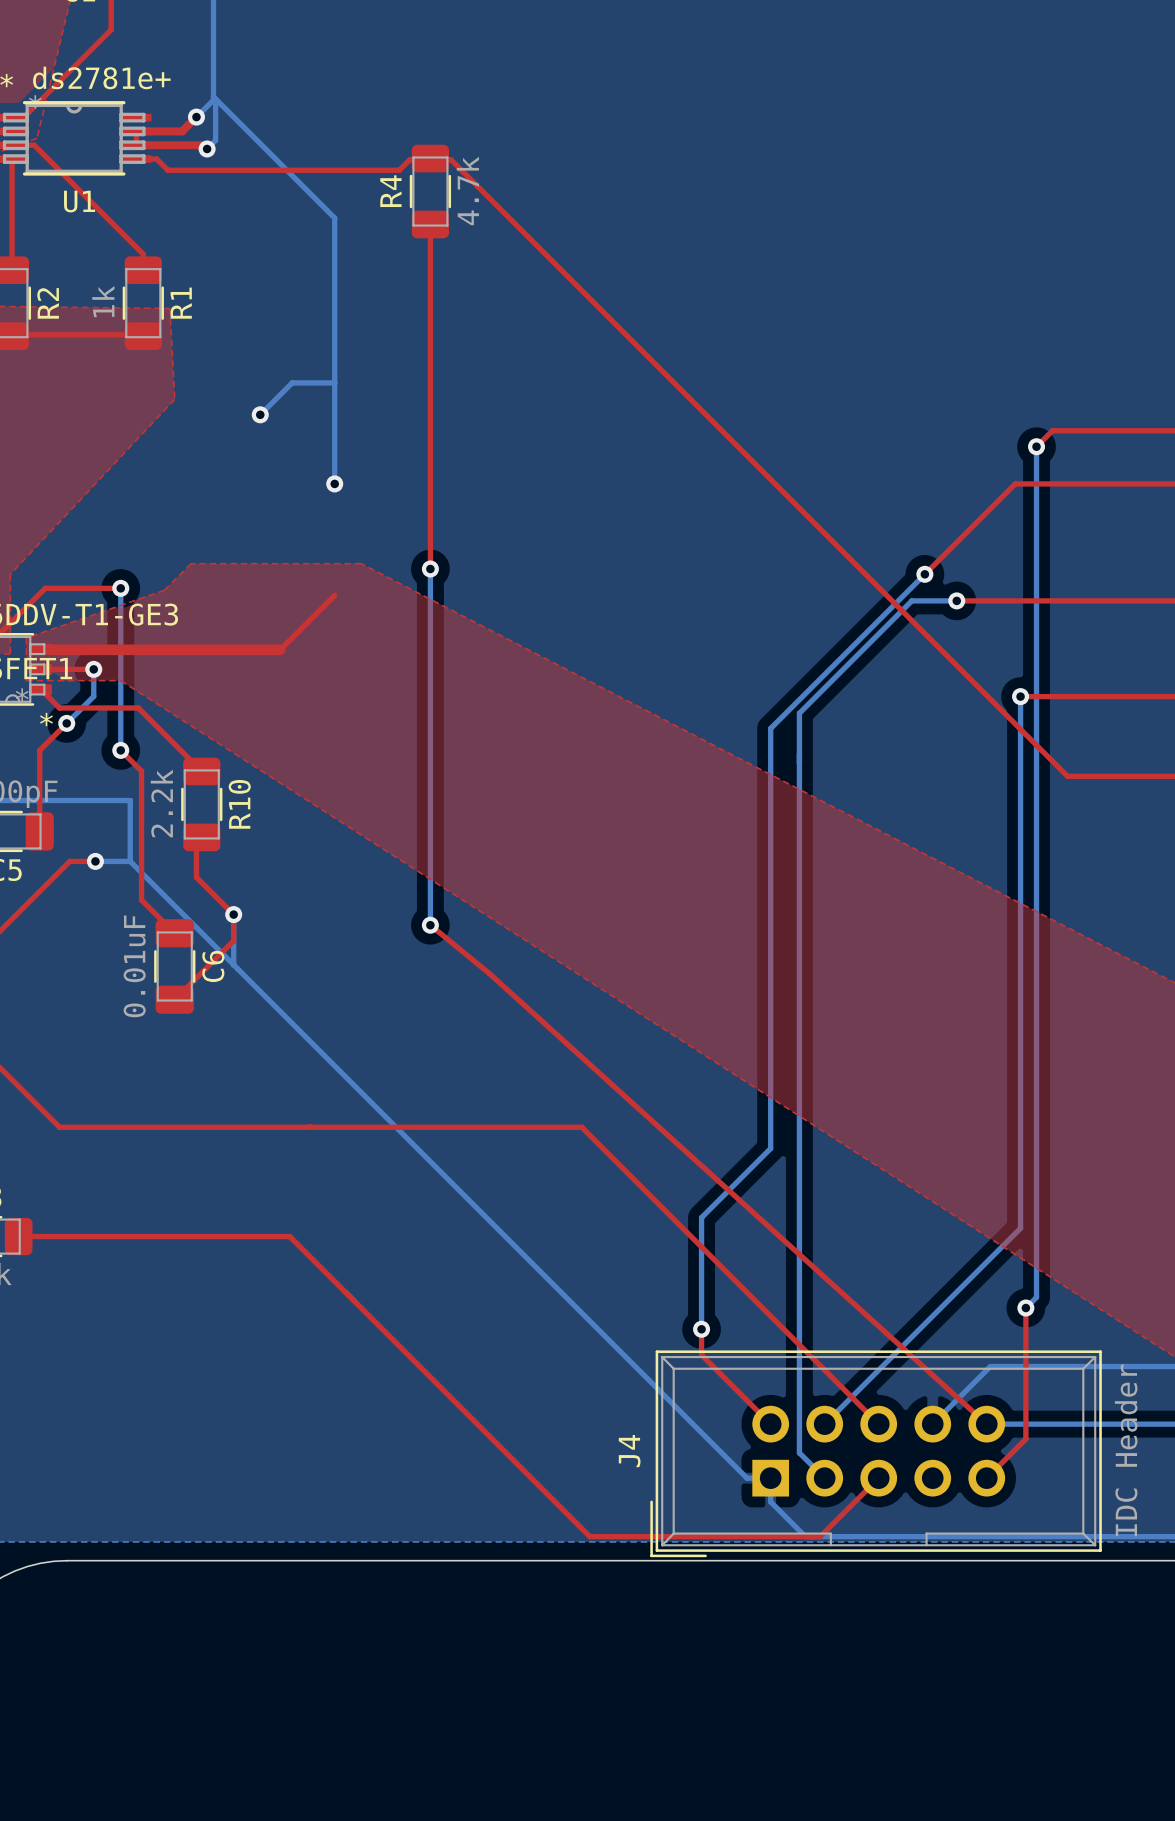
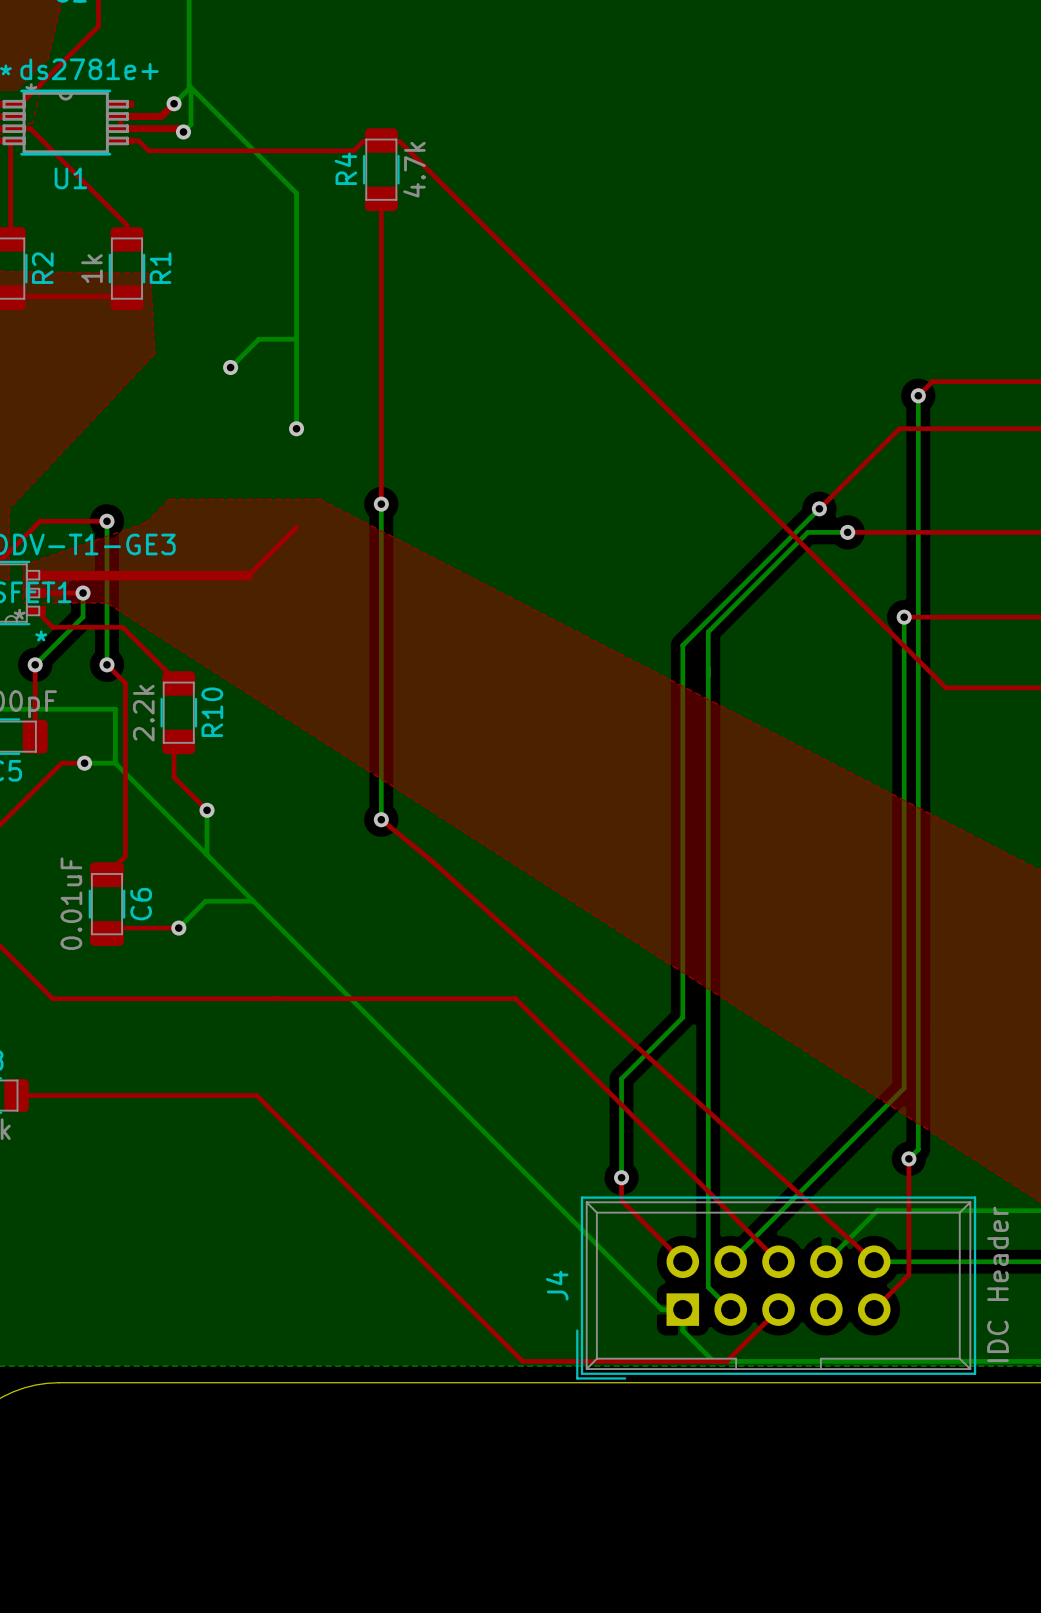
bottom track: none -> (59, 640) (35, 664)
top track: (66, 723) (39, 750) -> none
via position: (66, 723) -> (35, 664)
top track: (141, 900) (174, 933) -> (125, 797) (125, 856) (106, 874)
top track: (233, 914) (233, 940) (174, 999) -> none
C6 position: (174, 966) -> (106, 904)
bottom track: none -> (253, 901) (205, 901) (178, 928)
top track: none -> (178, 928) (112, 928) (106, 933)
via: none -> (178, 928)

